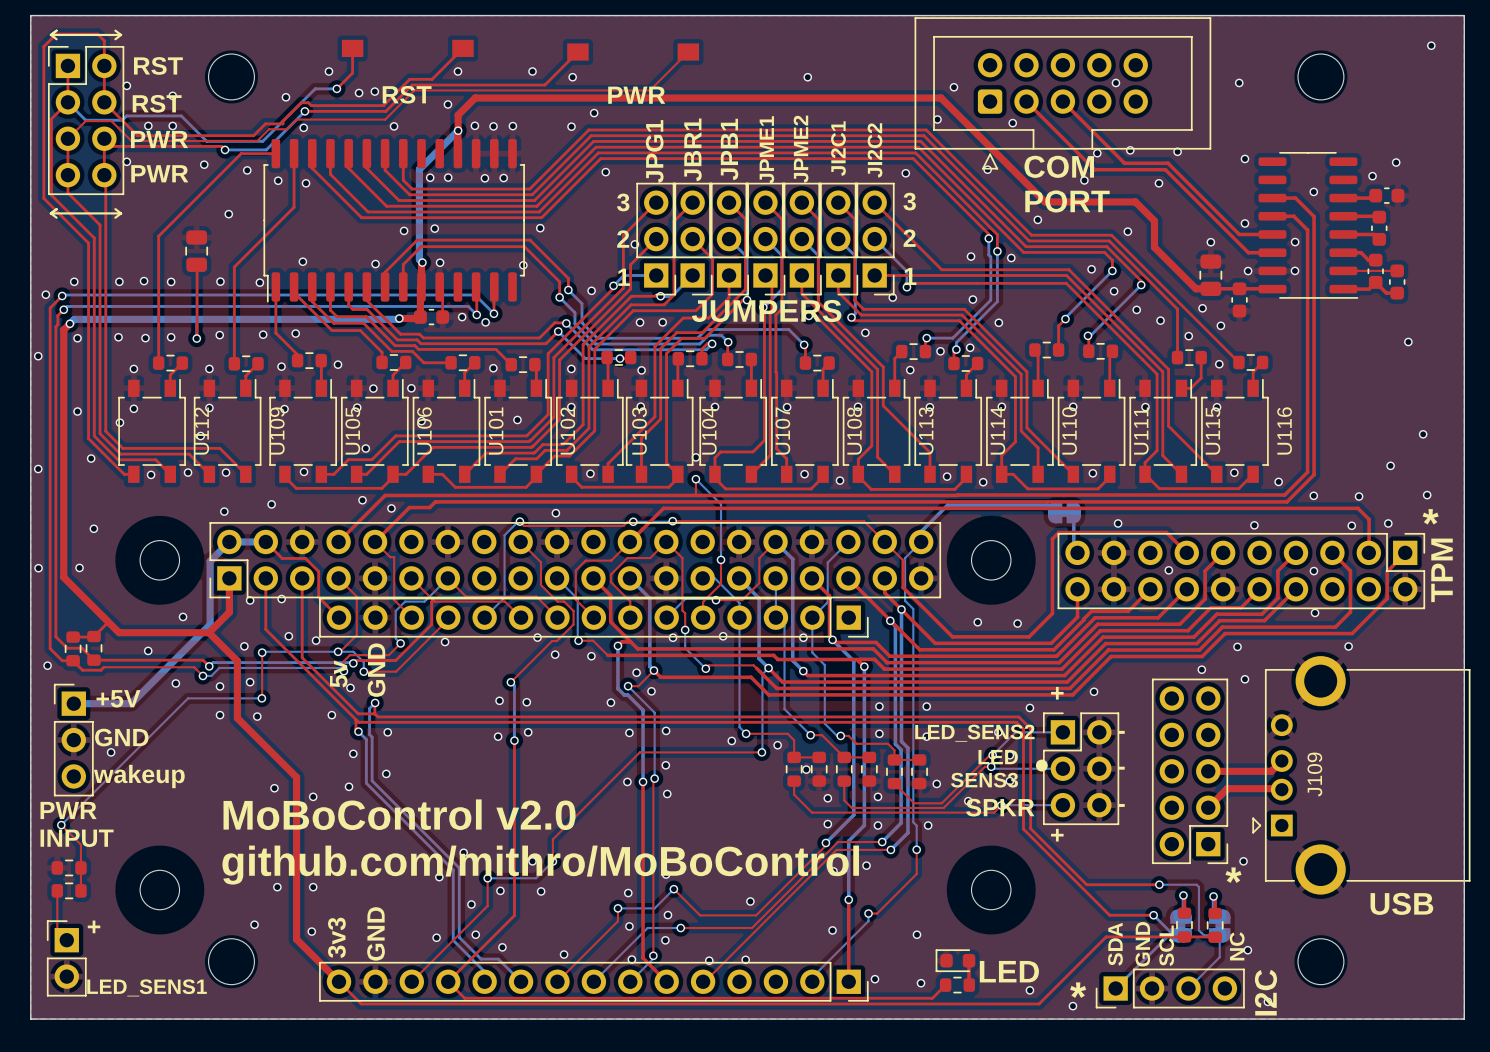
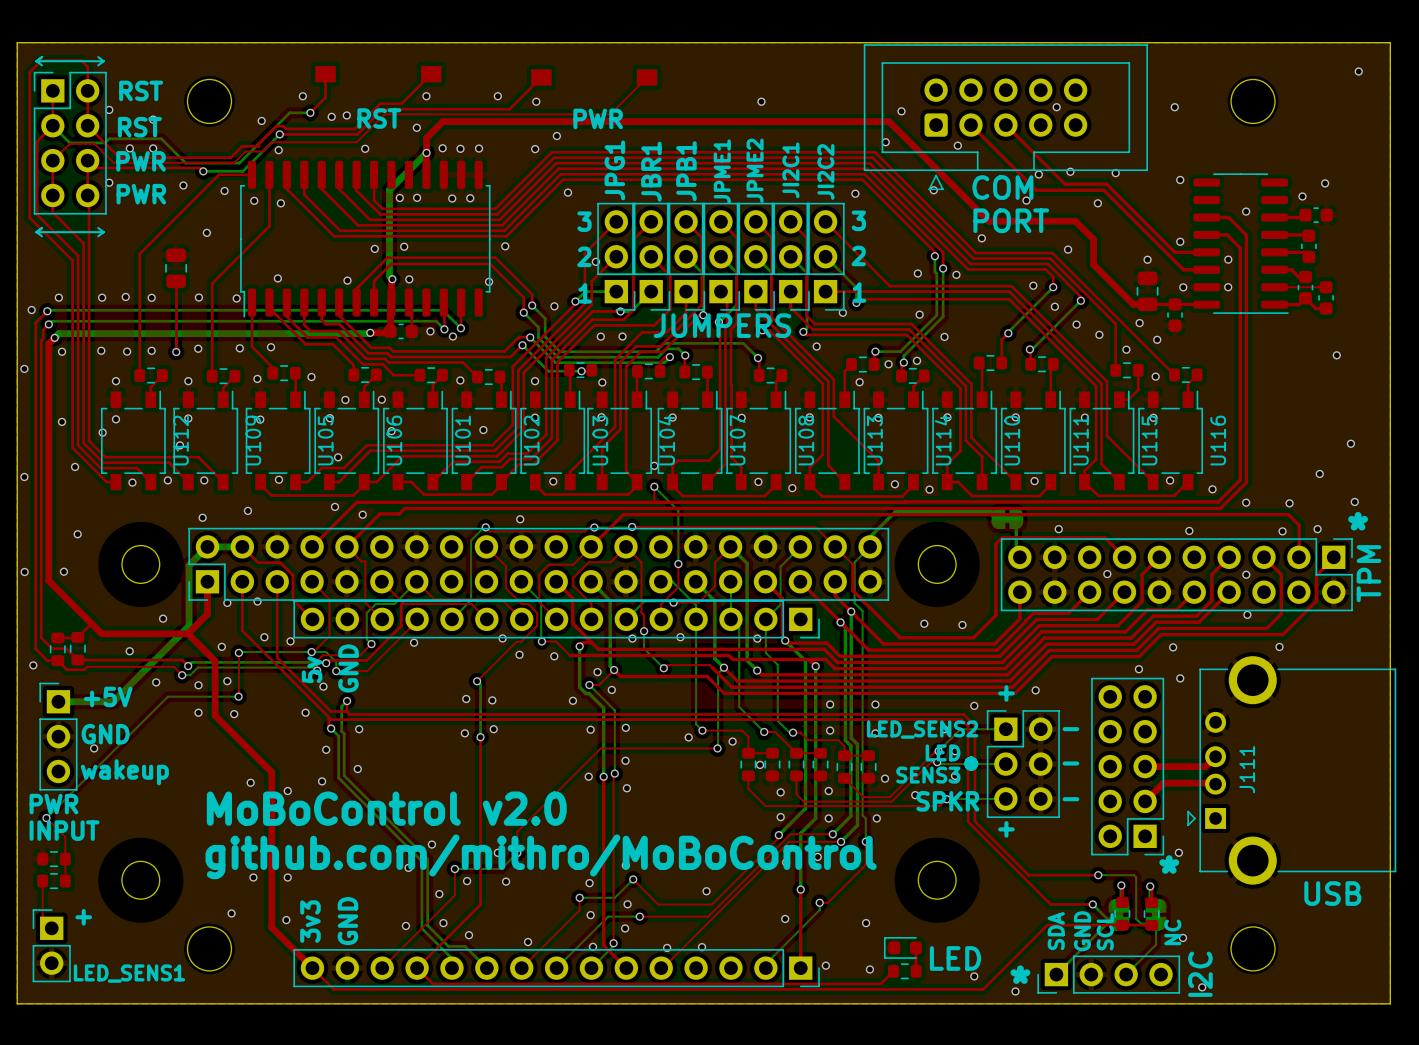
J109 name: J109 (1314, 774) -> J111 (1247, 769)

